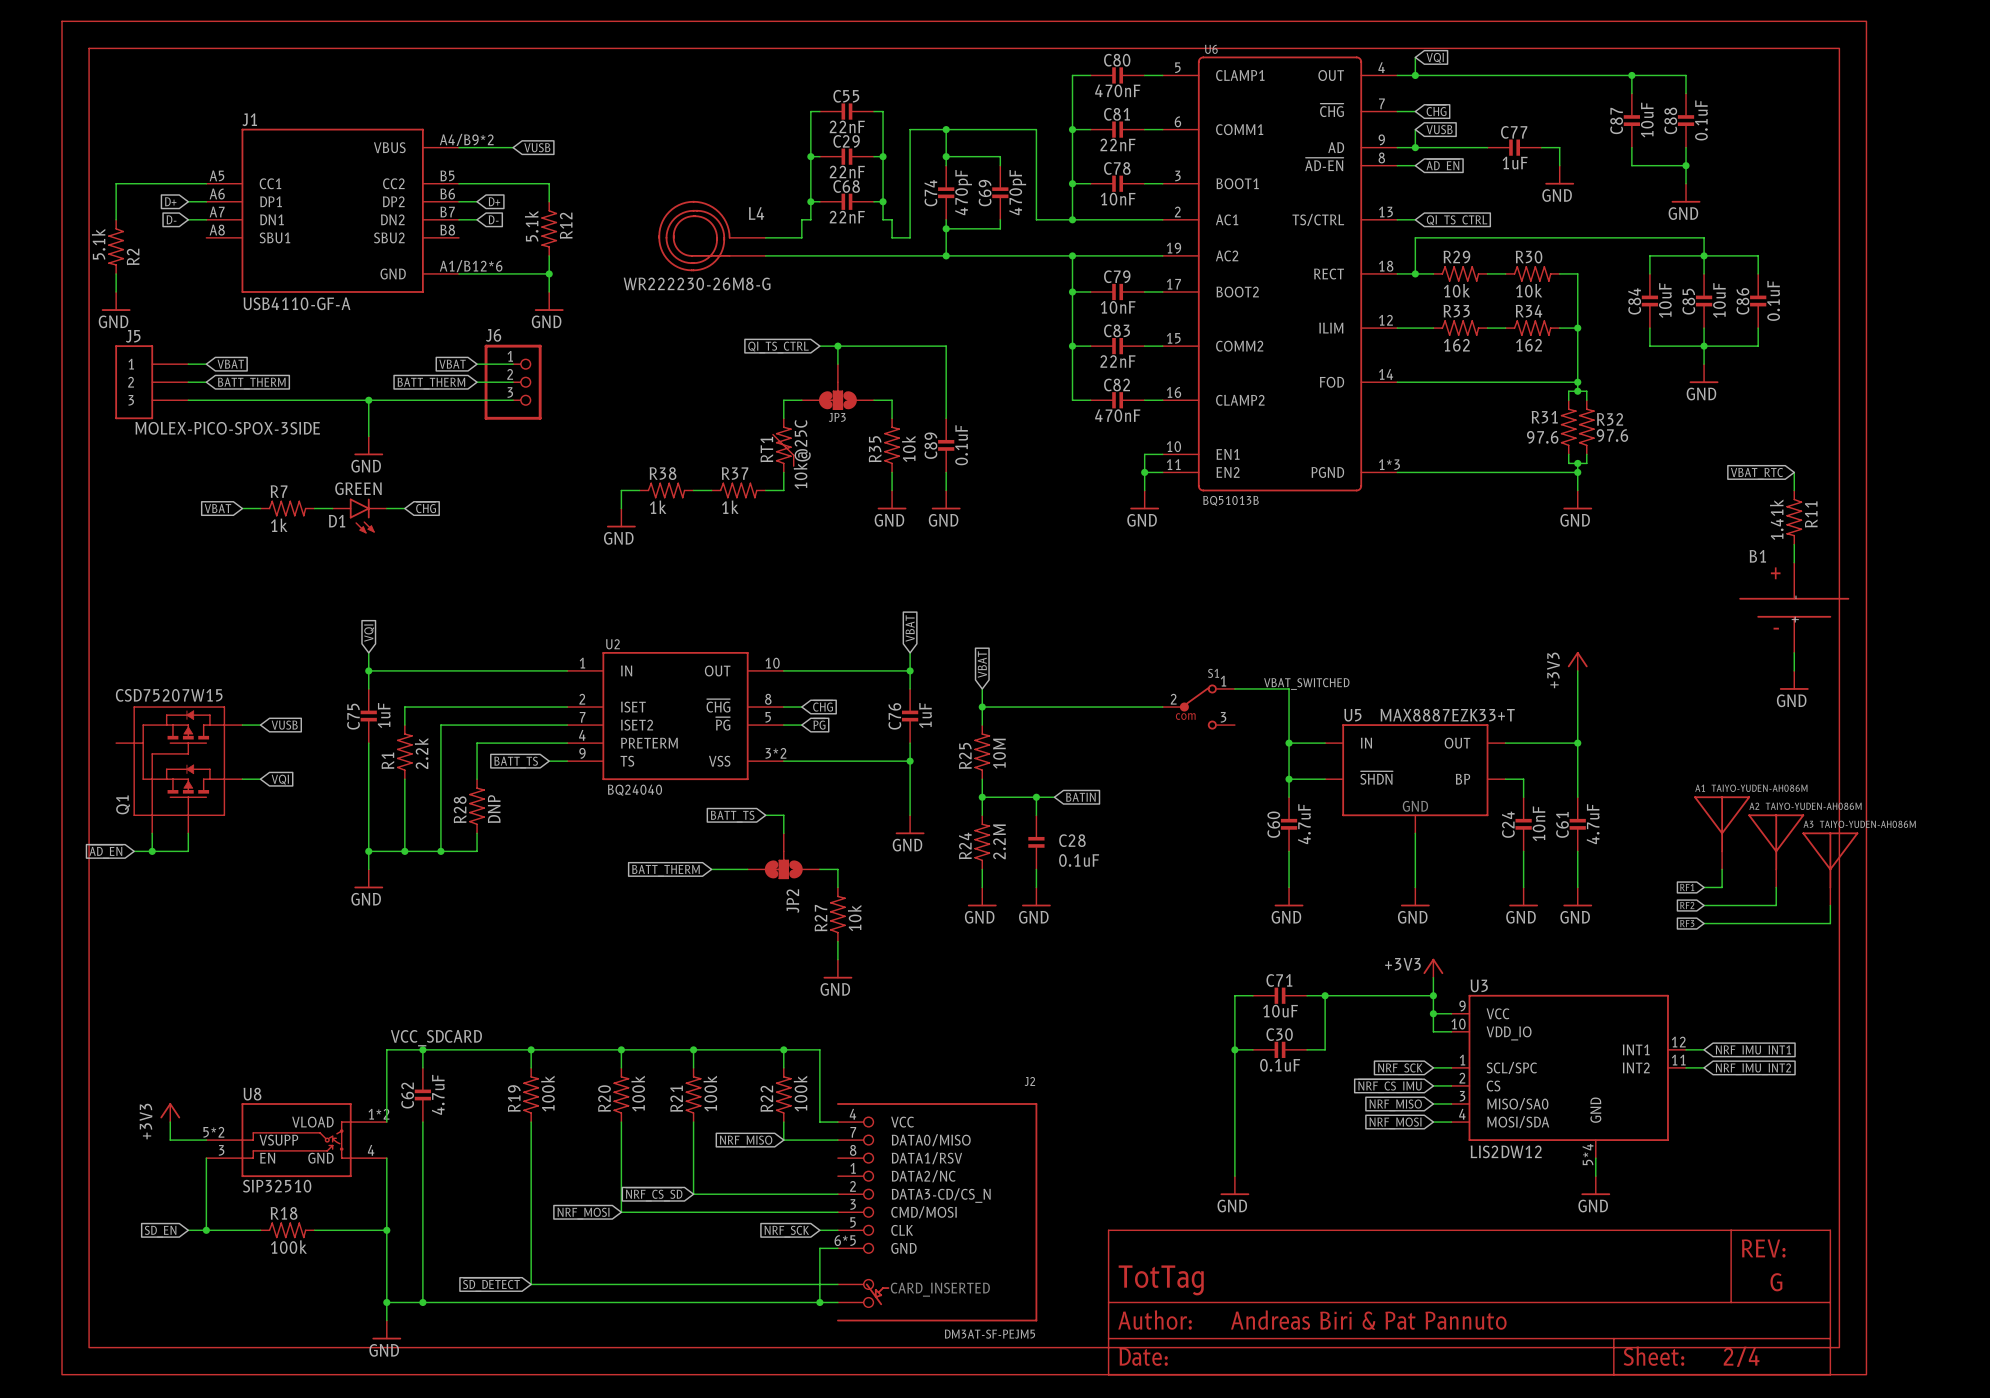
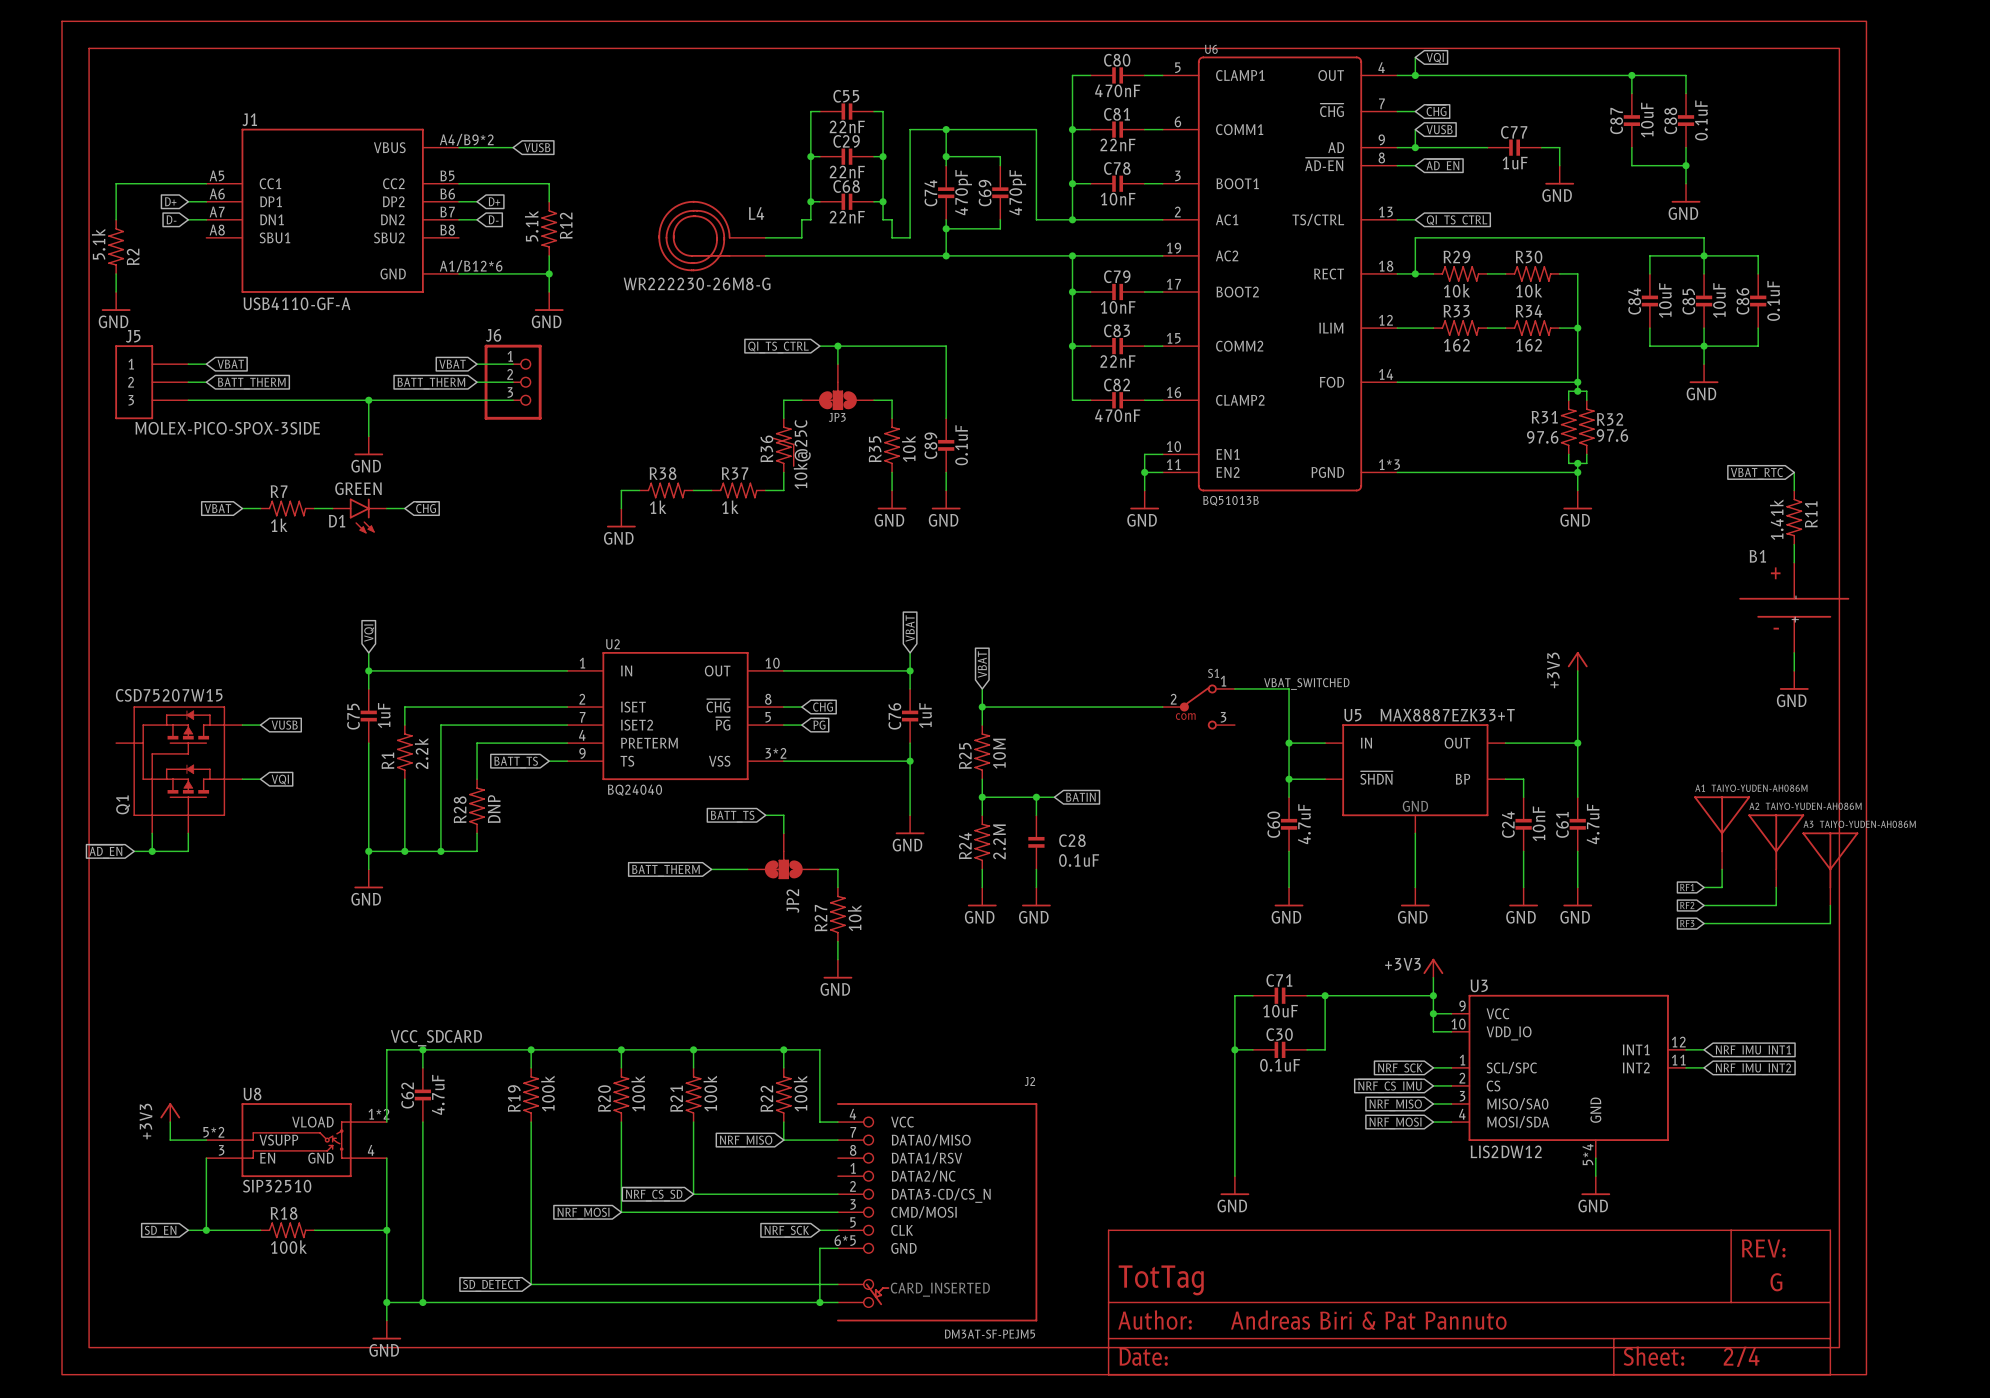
RT1: 10k@25C (783, 445) -> none
R36: none -> 10k@25C (783, 445)

